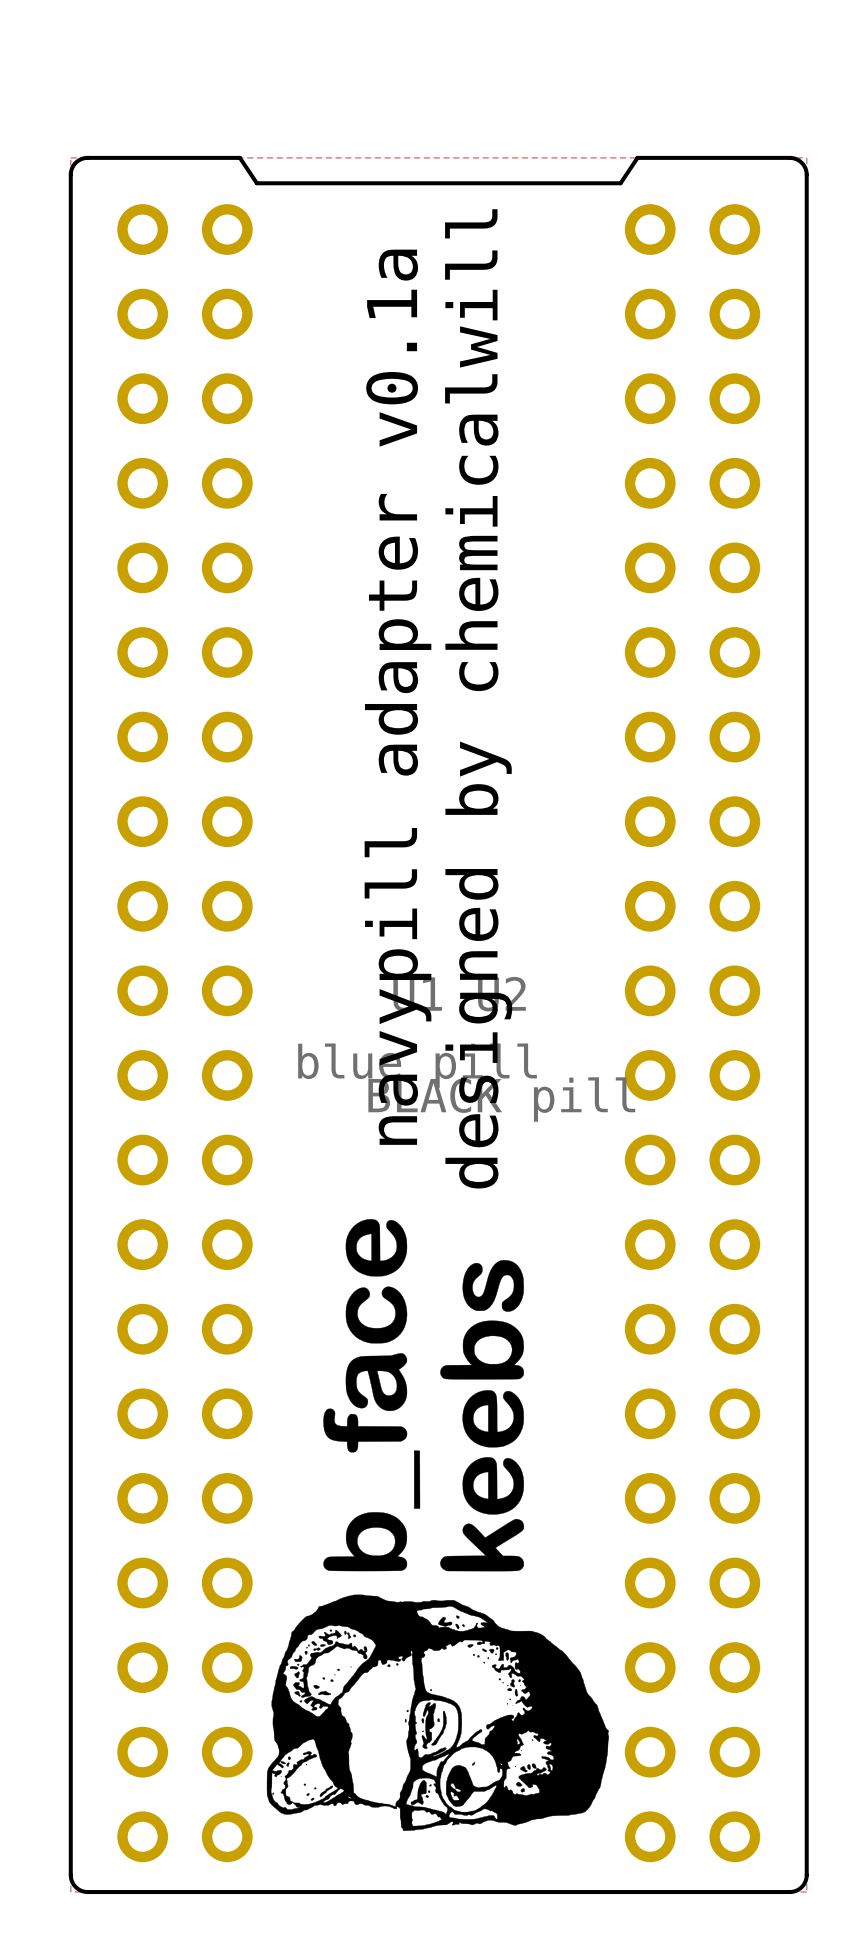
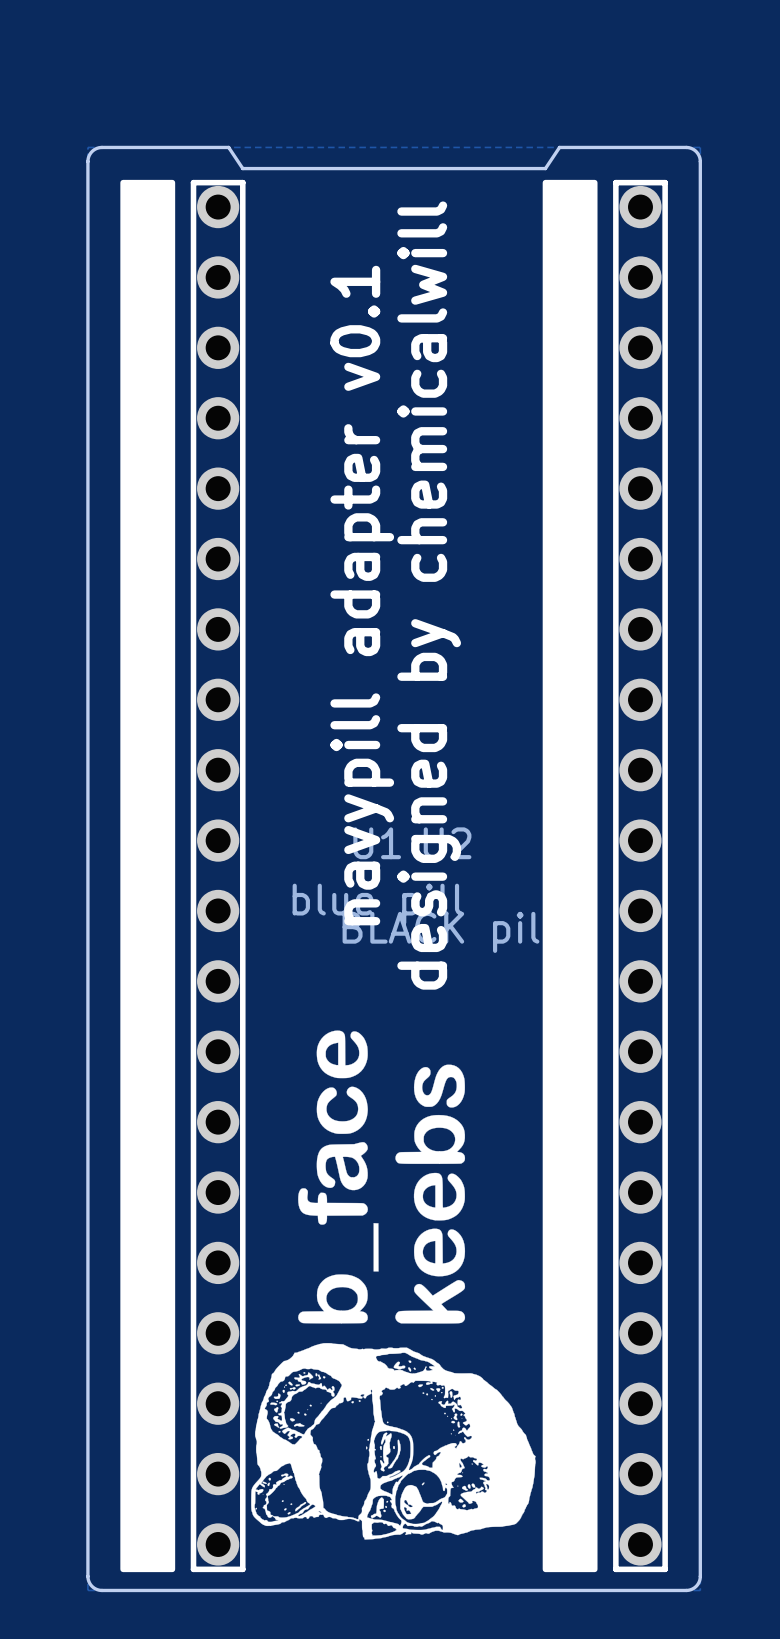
drawing: none -> [120, 179, 176, 1573]
drawing: none -> [542, 179, 598, 1573]
line: none -> (193, 182) (242, 182) (242, 1569) (193, 1569) (193, 182)
line: none -> (615, 182) (665, 182) (665, 1569) (615, 1569) (615, 182)
text: navypill adapter v0.1a (397, 697) -> navypill adapter v0.1 (362, 595)

